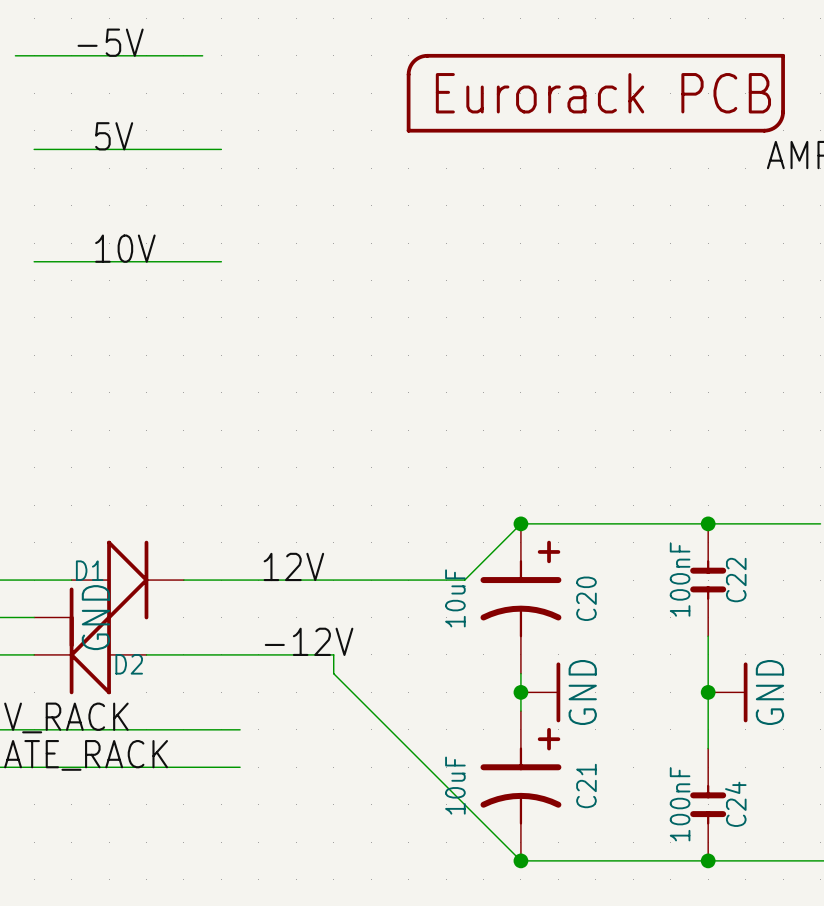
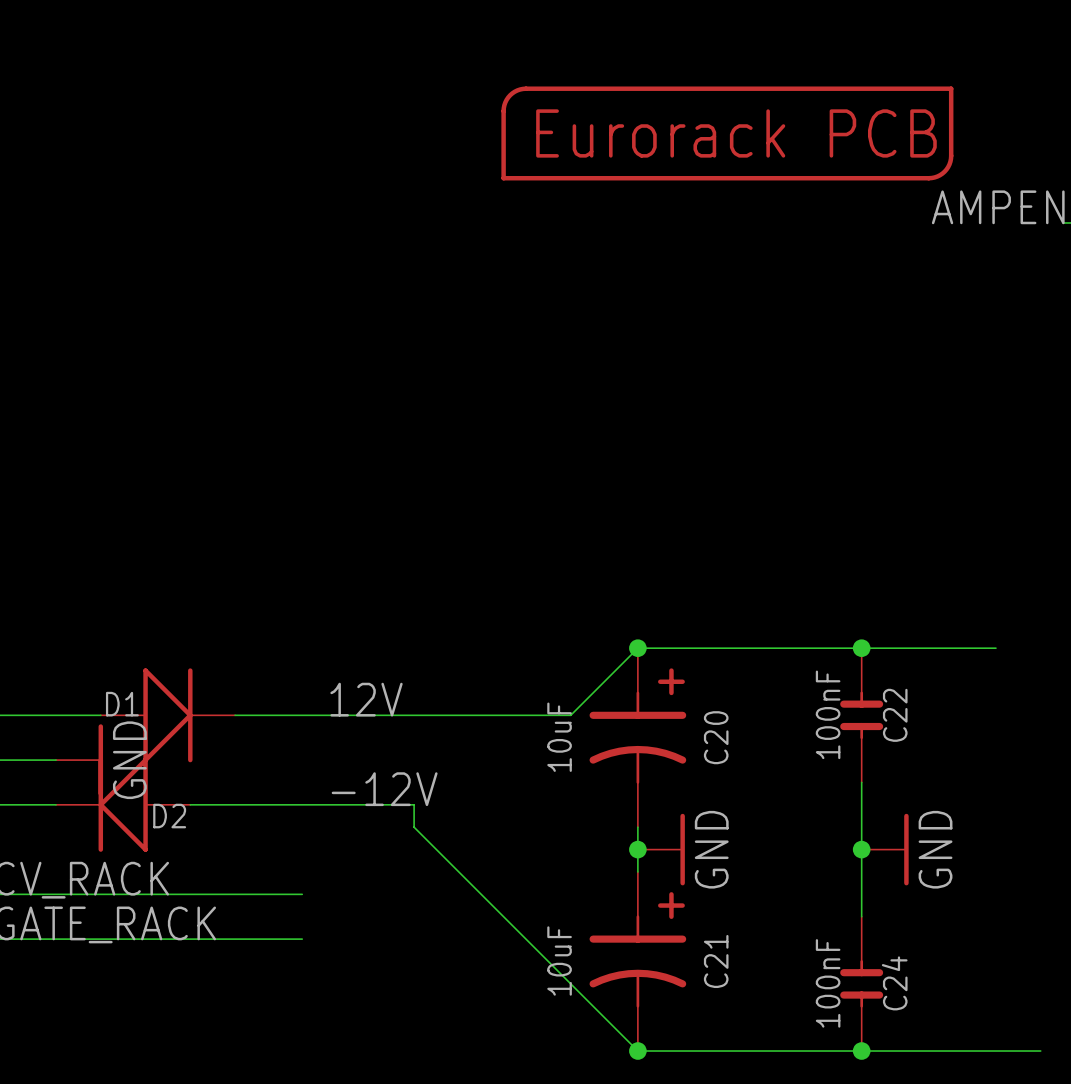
label: -5V (110, 42) -> none
wire: (15, 55) (202, 55) -> none
label: 5V (114, 136) -> none
wire: (34, 149) (221, 149) -> none
label: 10V (125, 248) -> none
wire: (34, 261) (221, 261) -> none

